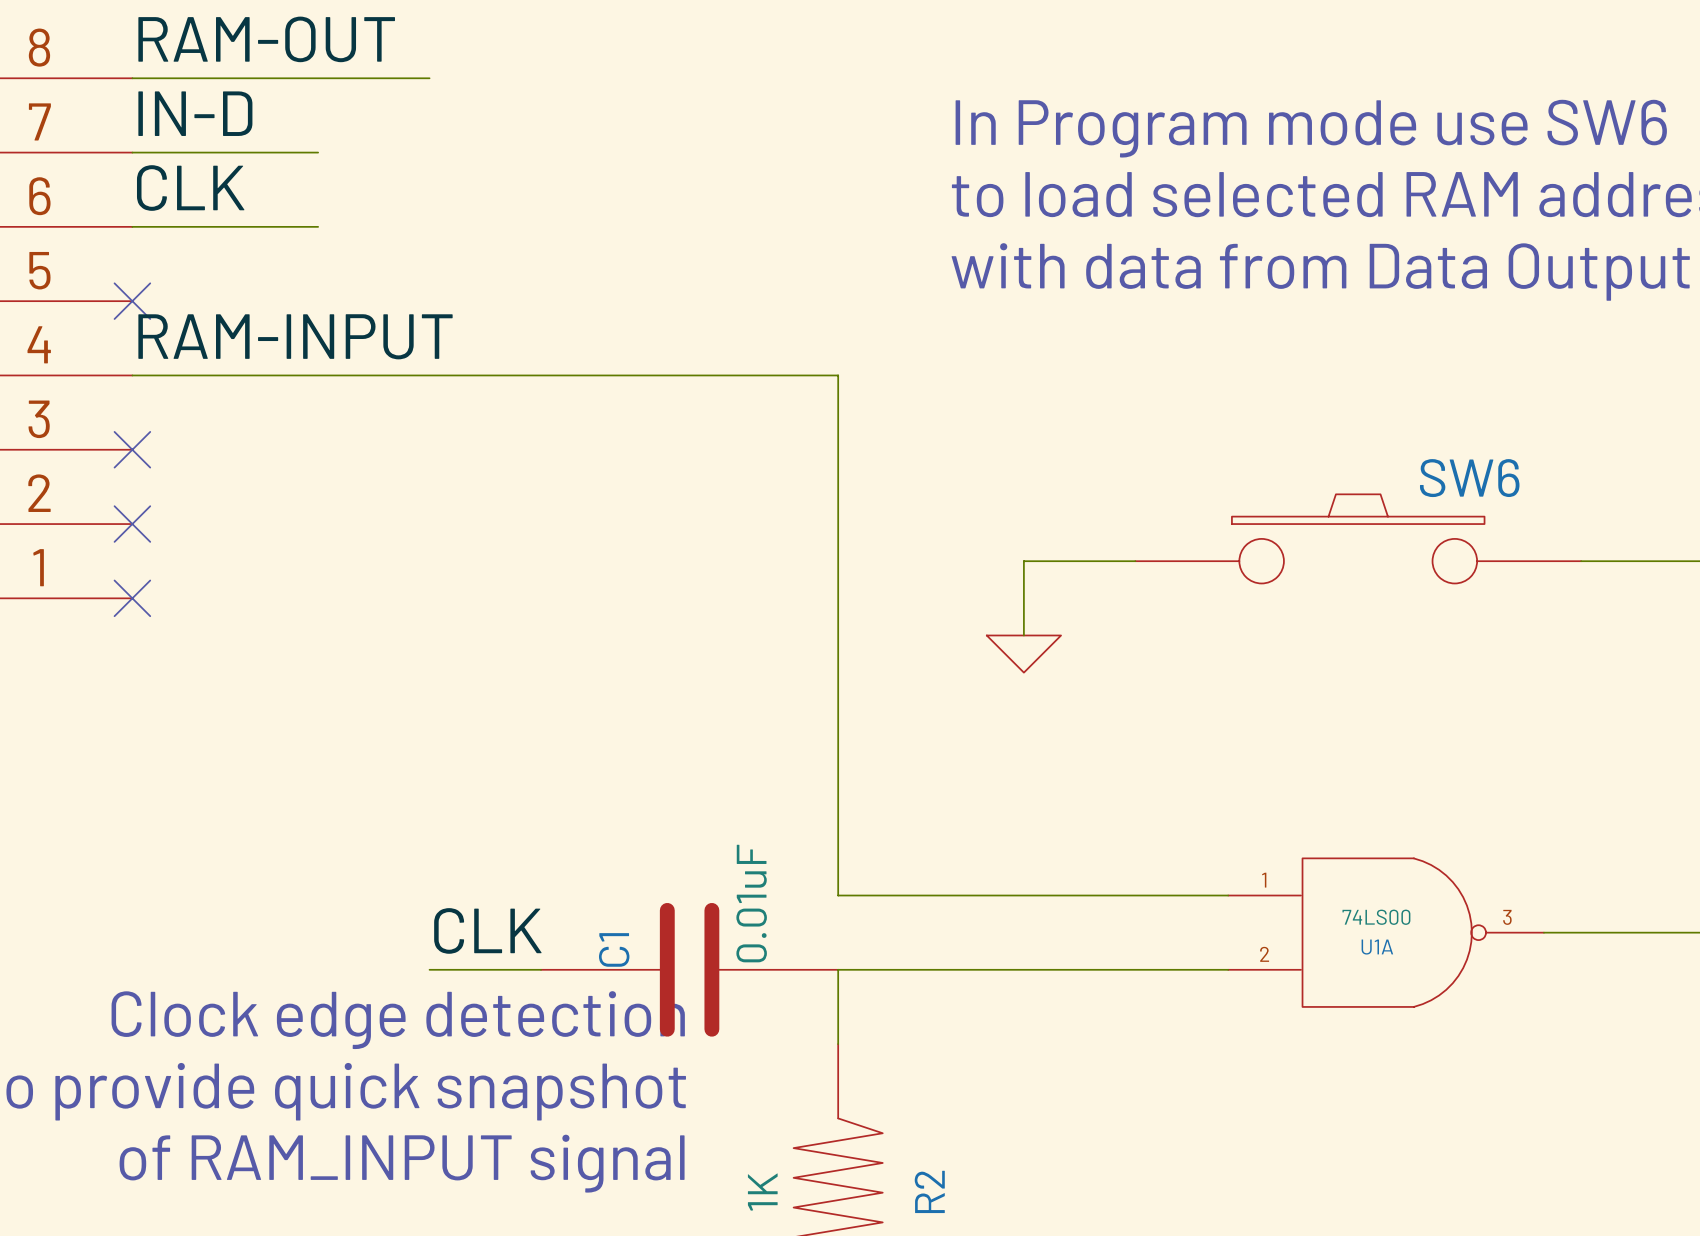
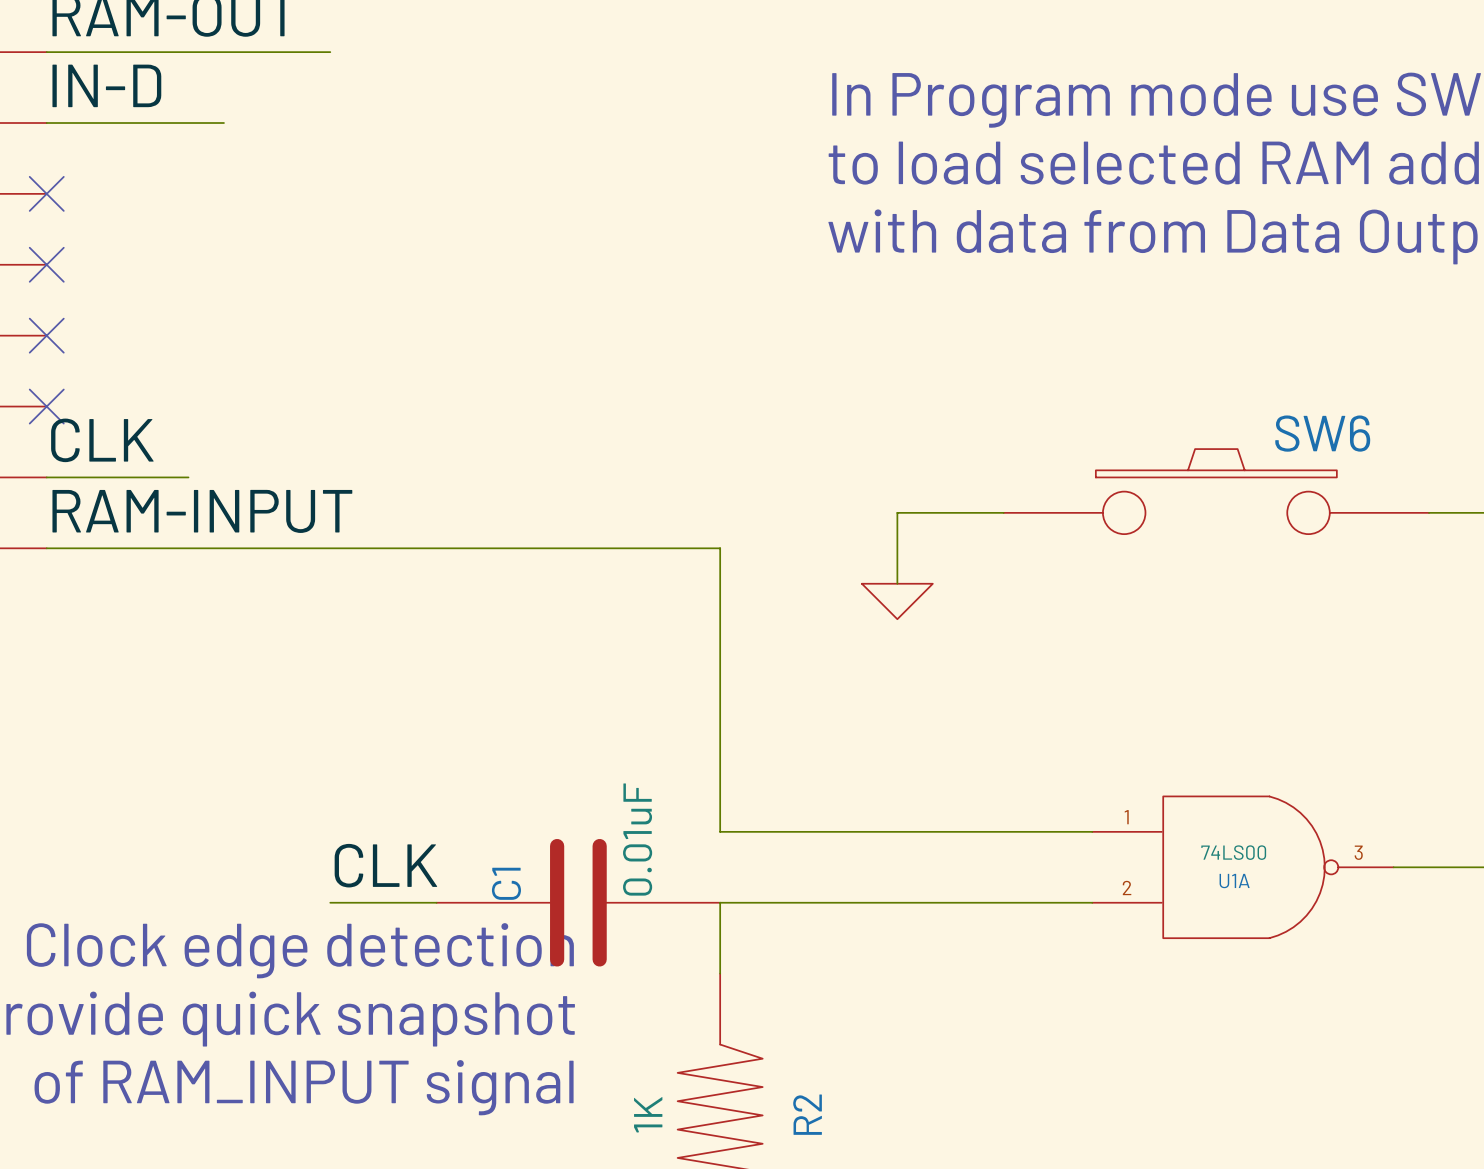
label position: CLK (190, 188) -> CLK (102, 440)
wire: (132, 226) (318, 226) -> none
no-connect mark: none -> (46, 193)
label position: RAM-INPUT (295, 336) -> RAM-INPUT (202, 511)
wire: (132, 375) (838, 375) (838, 598) -> (46, 548) (720, 548)
no-connect mark: none -> (46, 335)
wire: none -> (46, 477) (188, 477)
no-connect mark: (132, 524) -> none
no-connect mark: (132, 598) -> none

